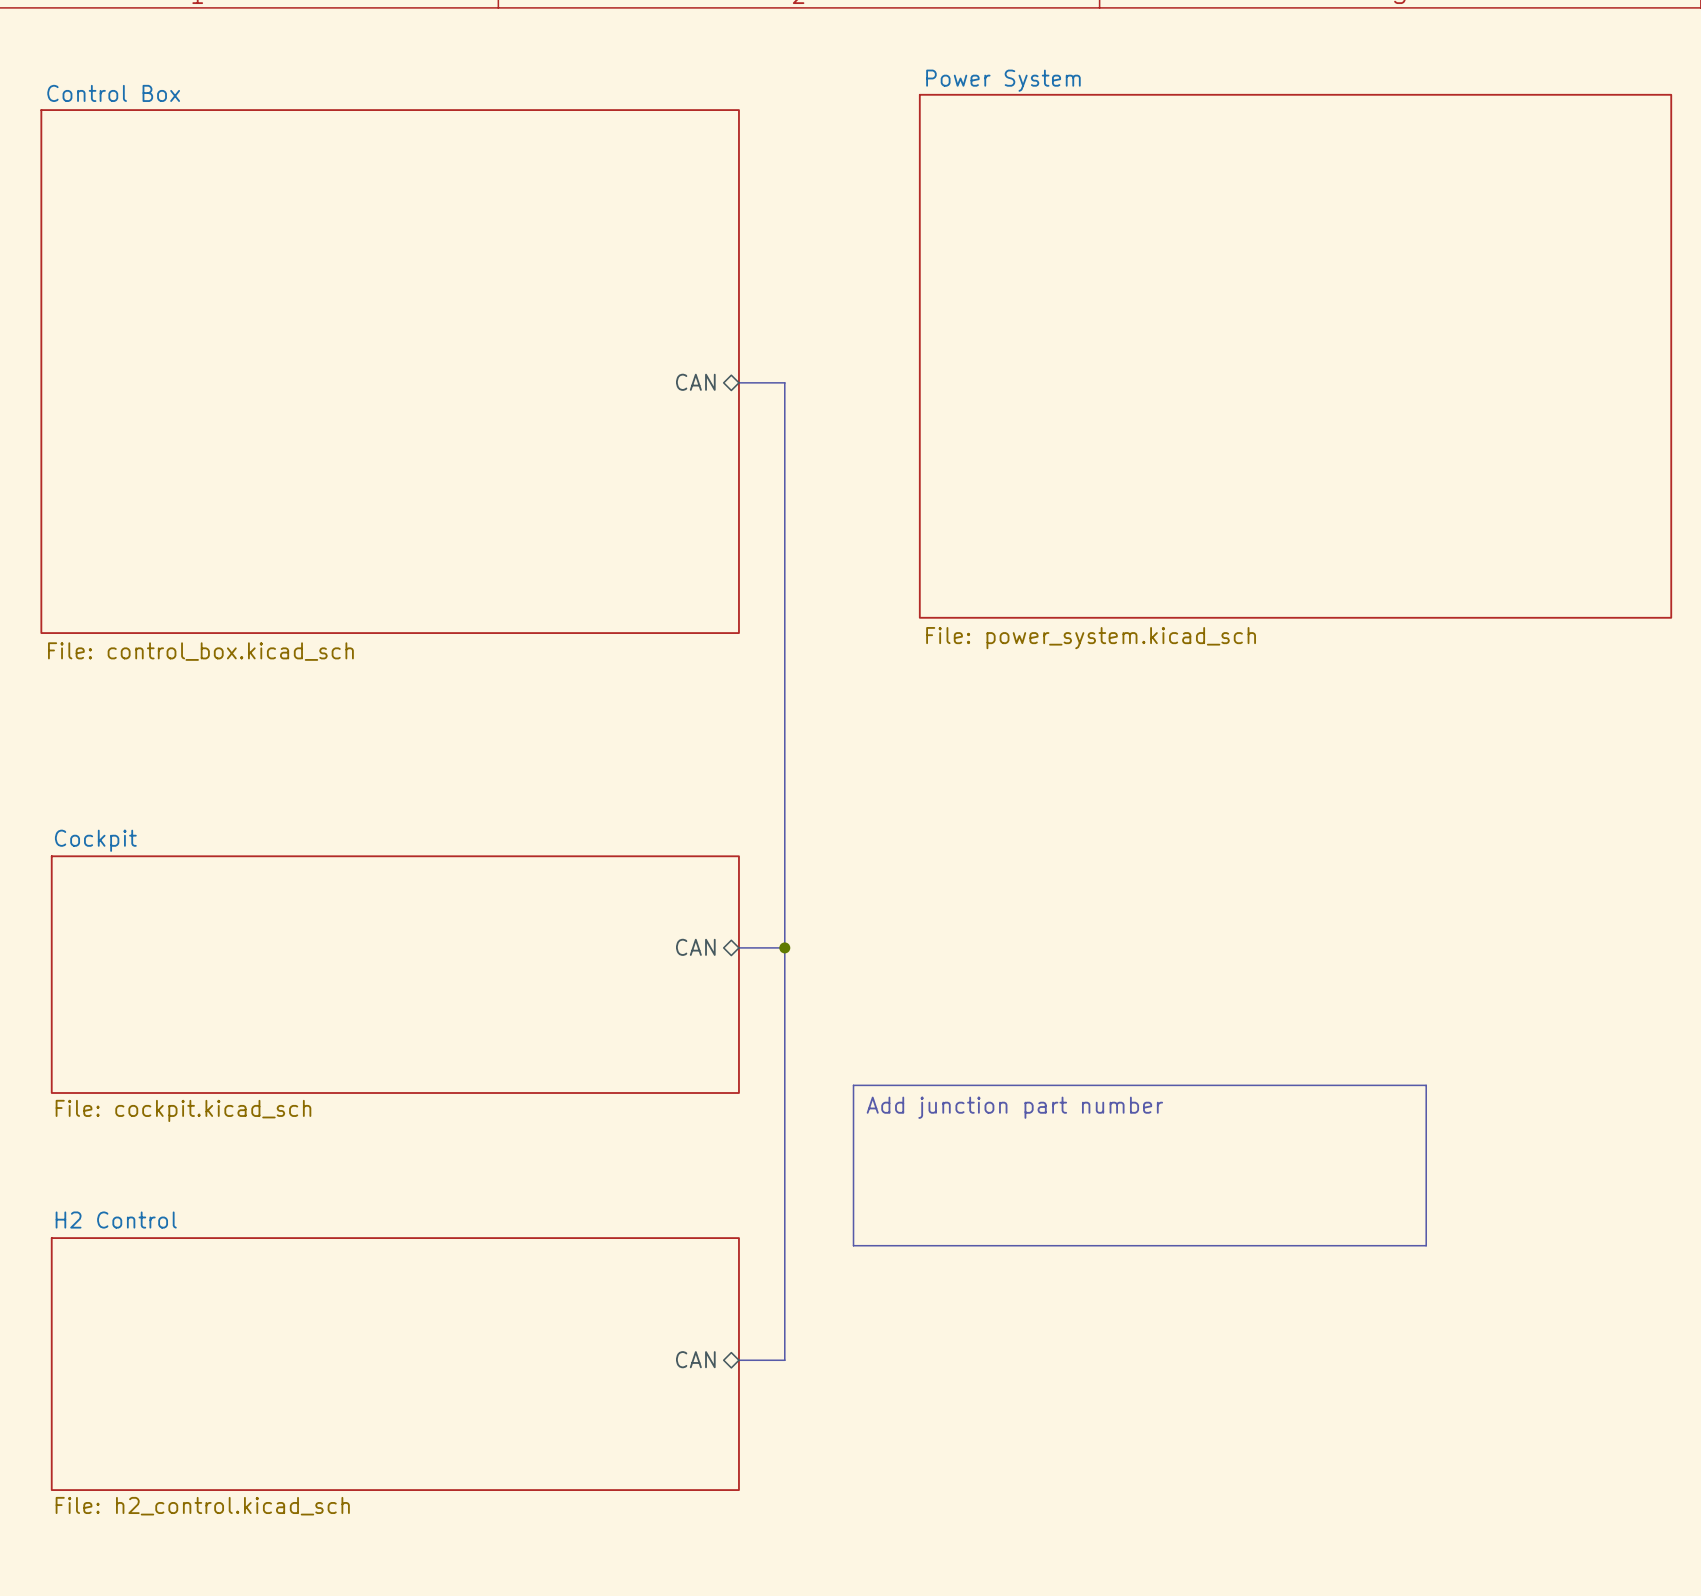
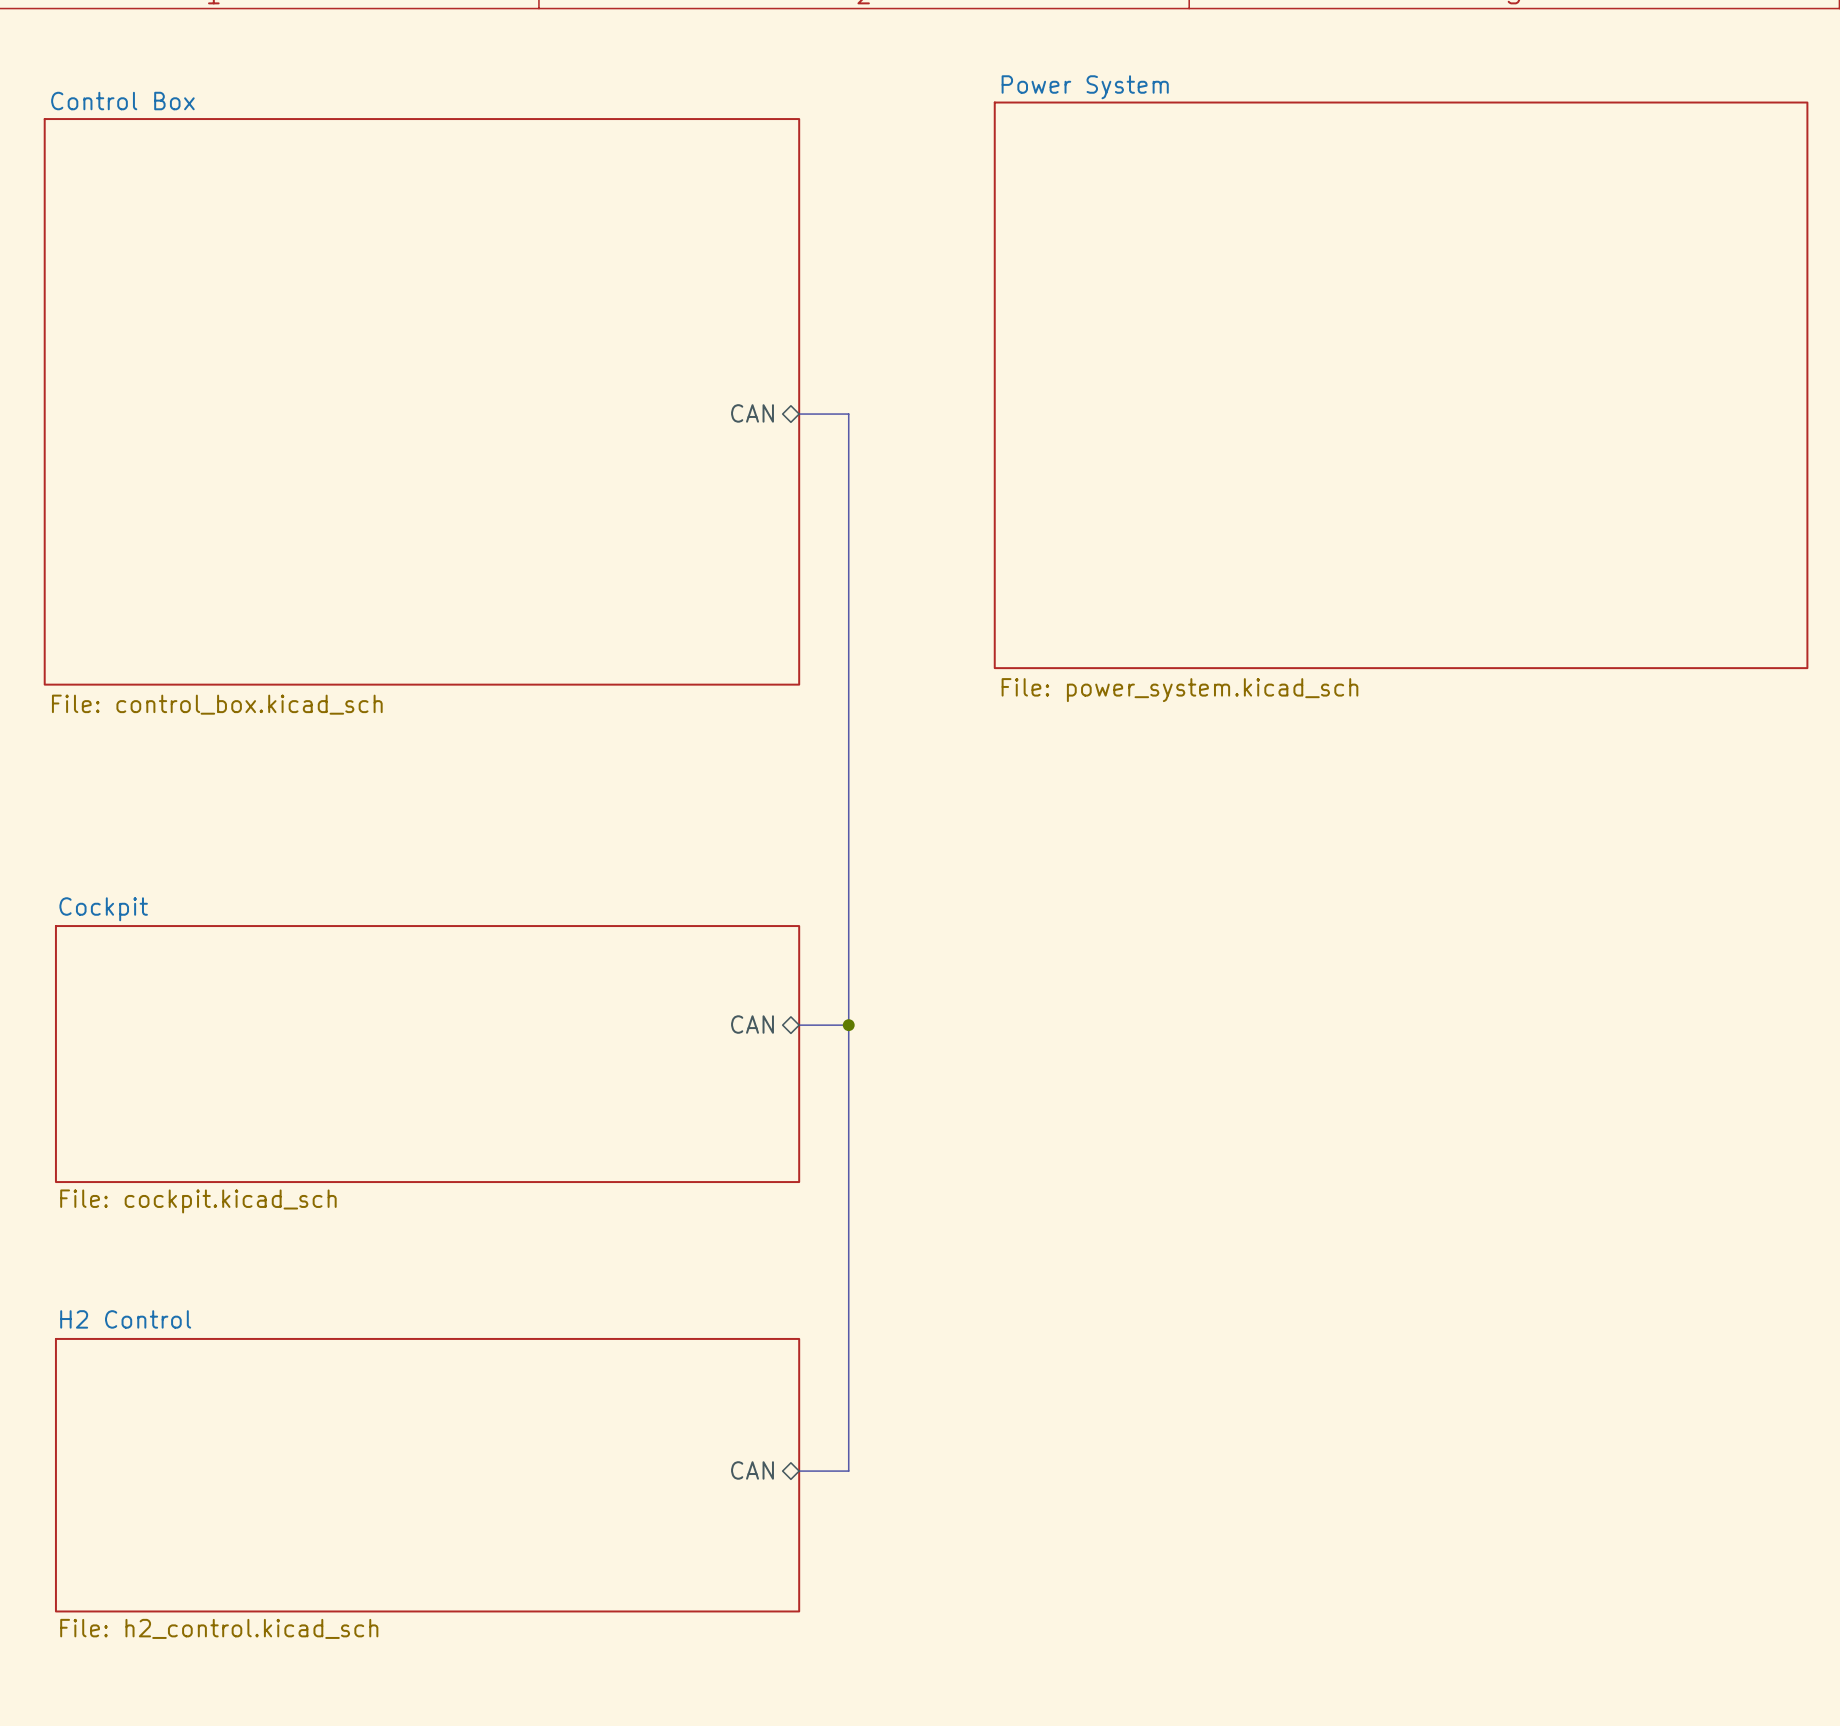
line: (853, 1085) (1426, 1085) (1426, 1245) (853, 1245) (853, 1085) -> none
text: Add junction part number (1014, 1107) -> none

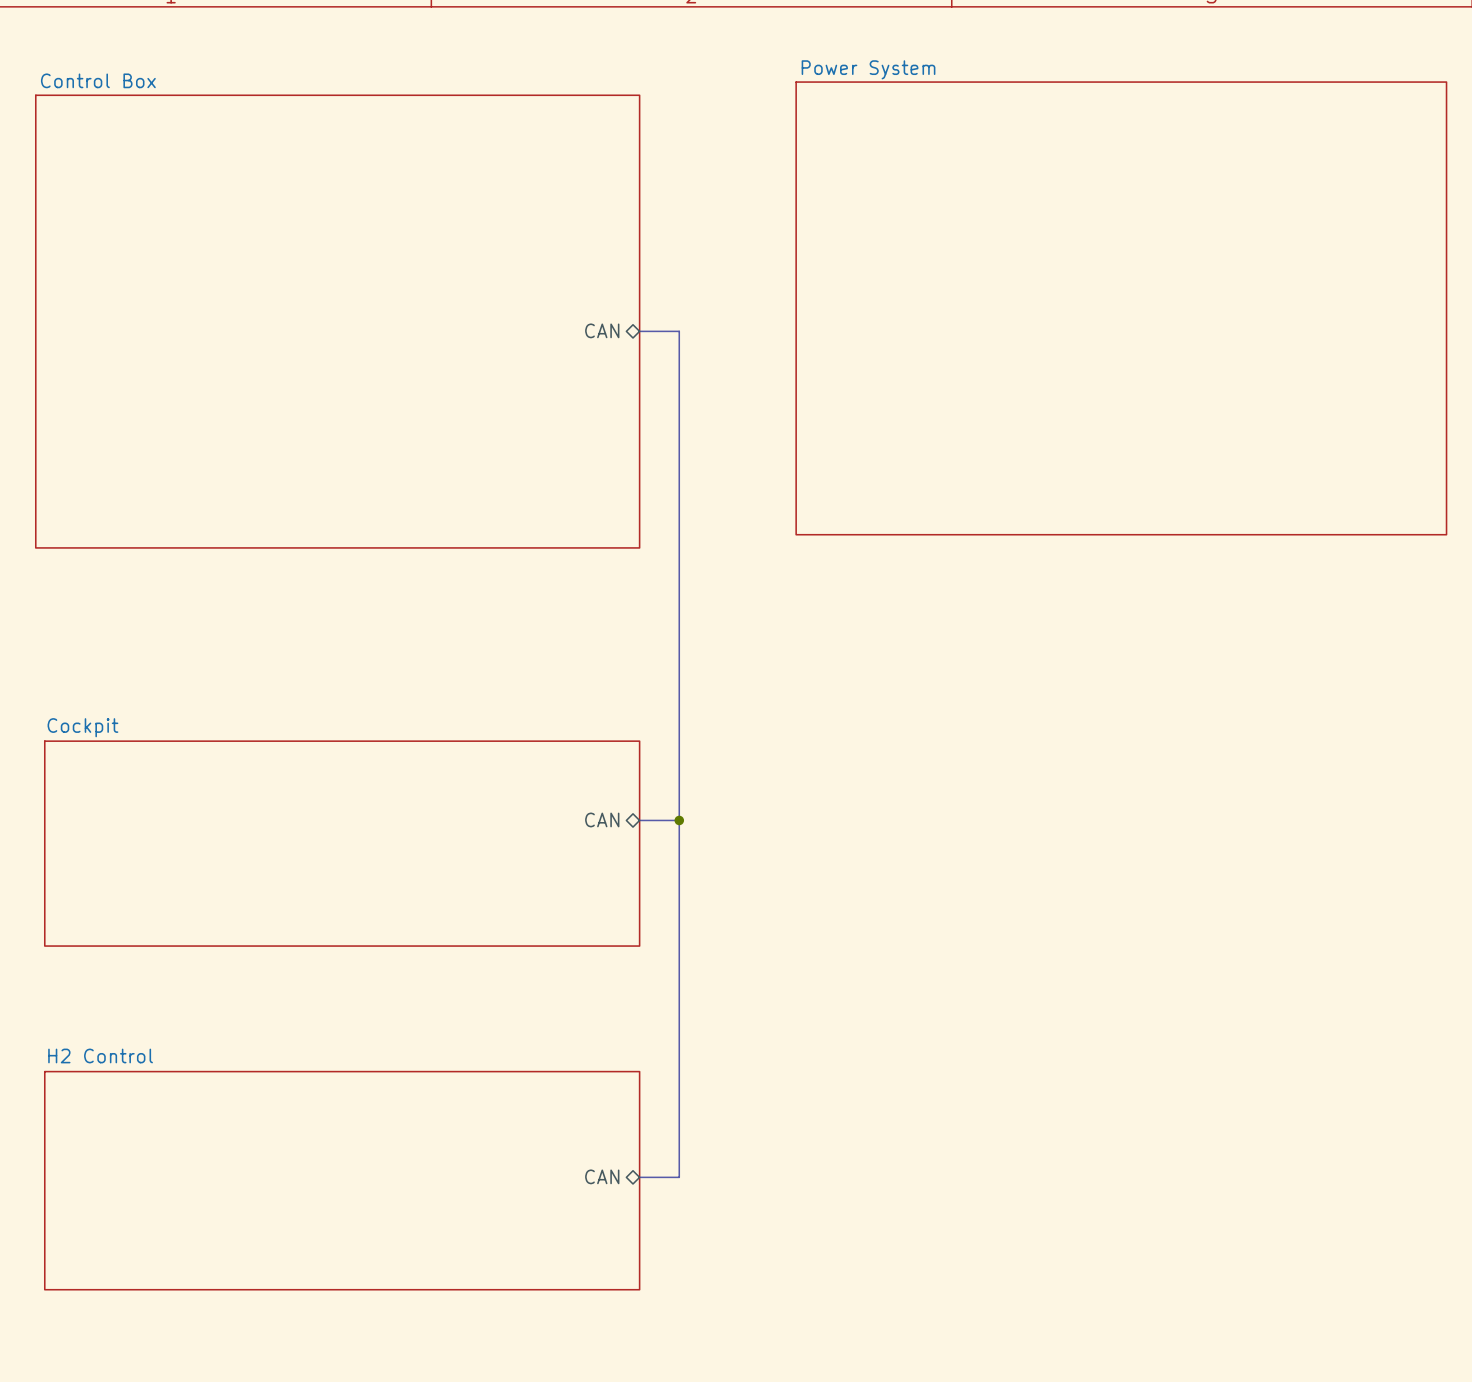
sheet Power System value: File: power_system.kicad_sch (1179, 690) -> none
sheet Control Box value: File: control_box.kicad_sch (217, 704) -> none
sheet Cockpit value: File: cockpit.kicad_sch (198, 1201) -> none
sheet H2 Control value: File: h2_control.kicad_sch (219, 1628) -> none

